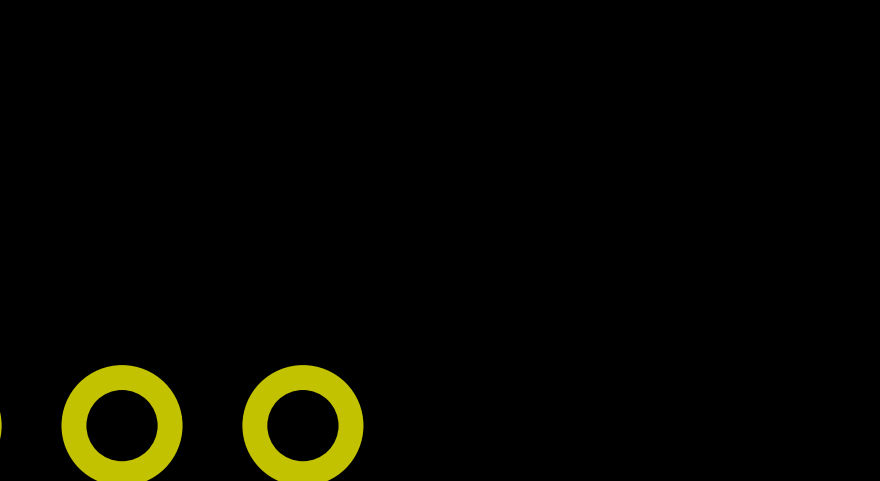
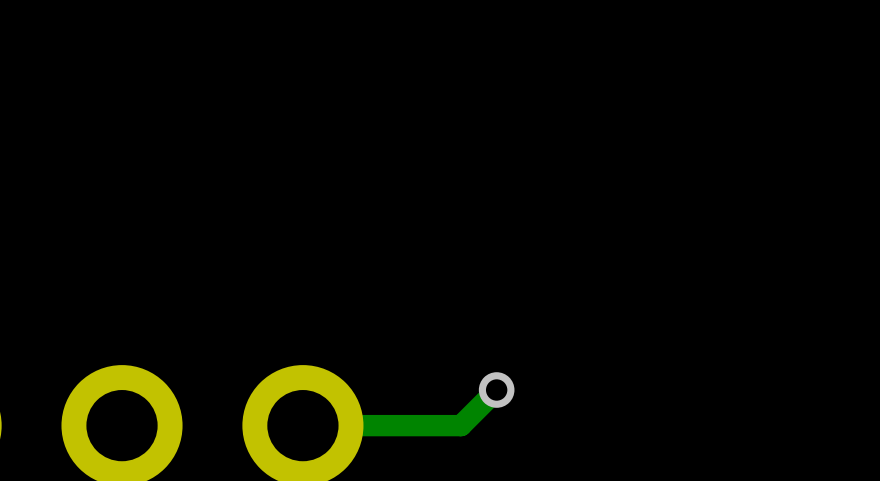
track: none -> (496, 390) (461, 425) (304, 425)
via: none -> (496, 390)

